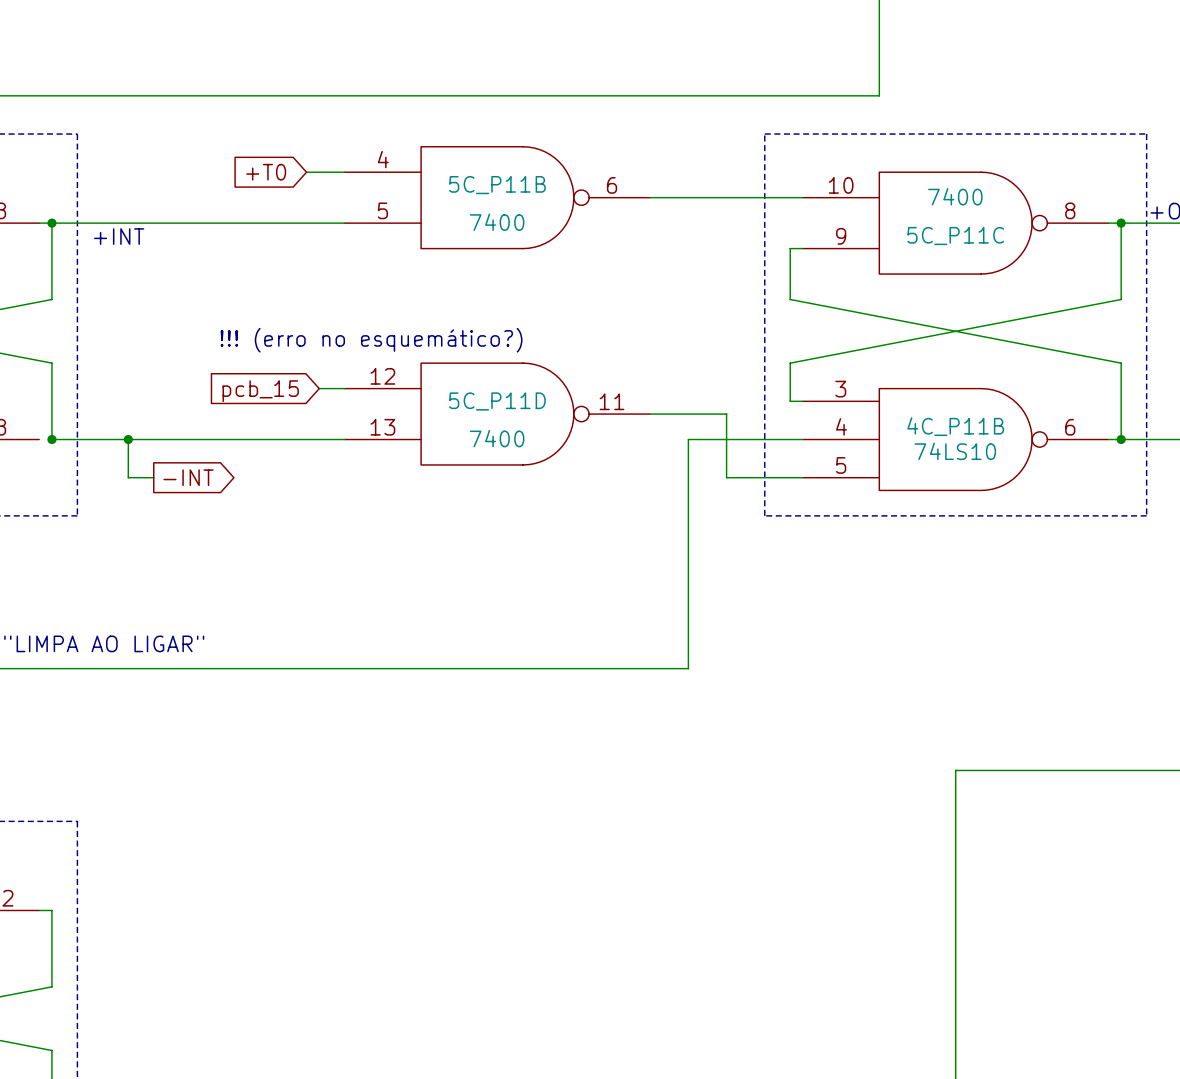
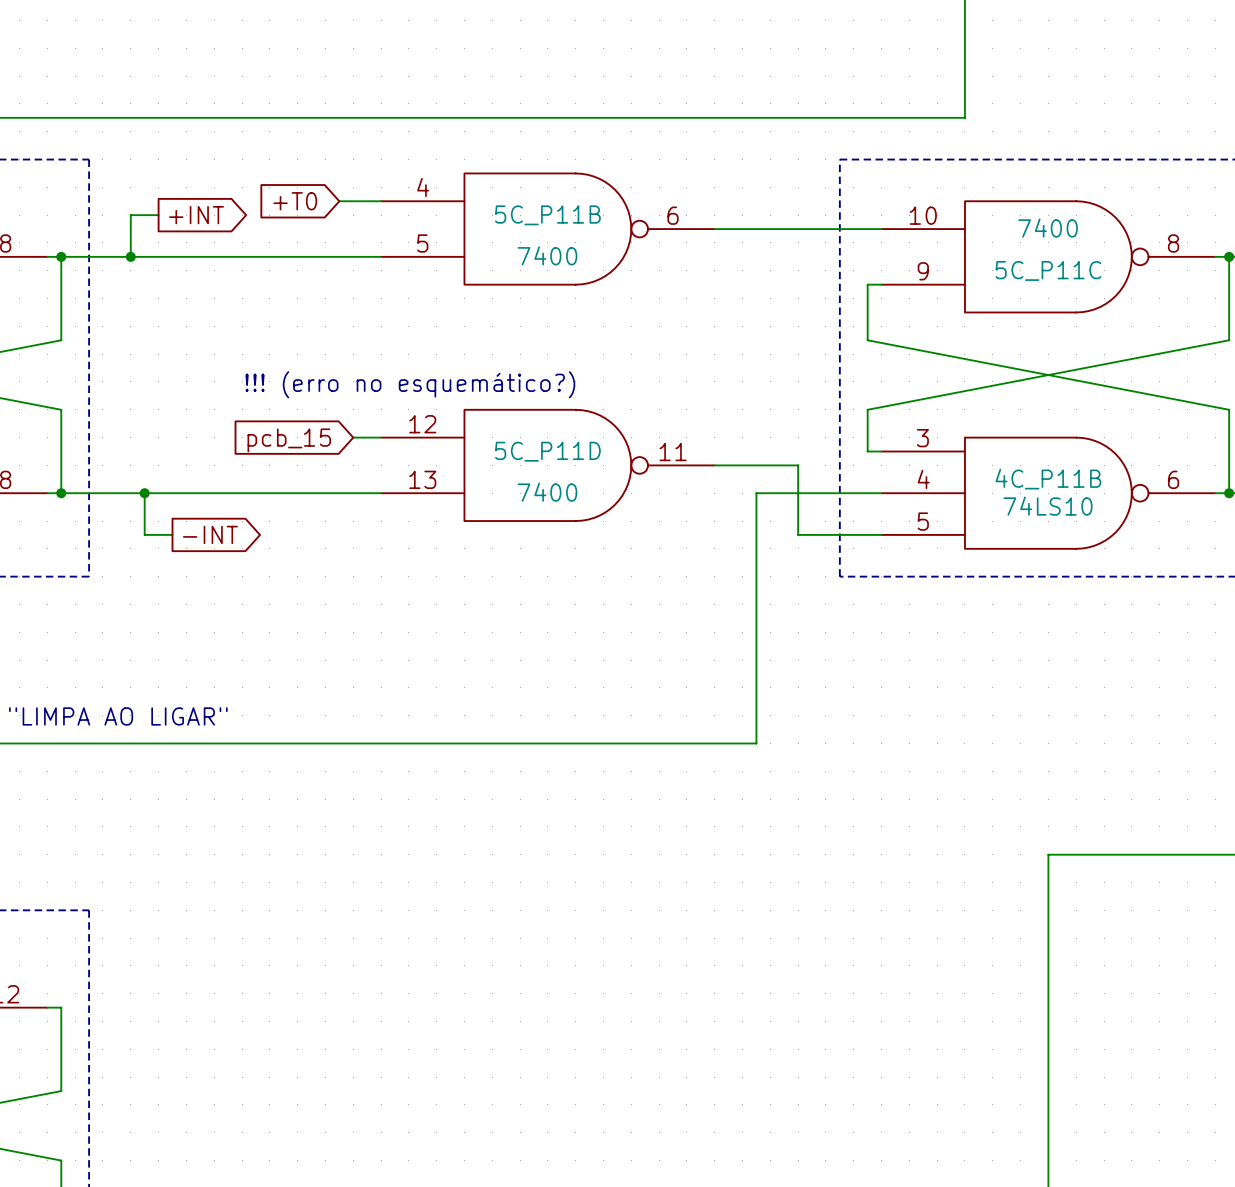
wire: none -> (158, 215) (130, 215) (130, 256)
global label: none -> +INT (196, 215)
junction: none -> (130, 256)
text: +INT (119, 236) -> none
wire: none -> (47, 493) (61, 493)

